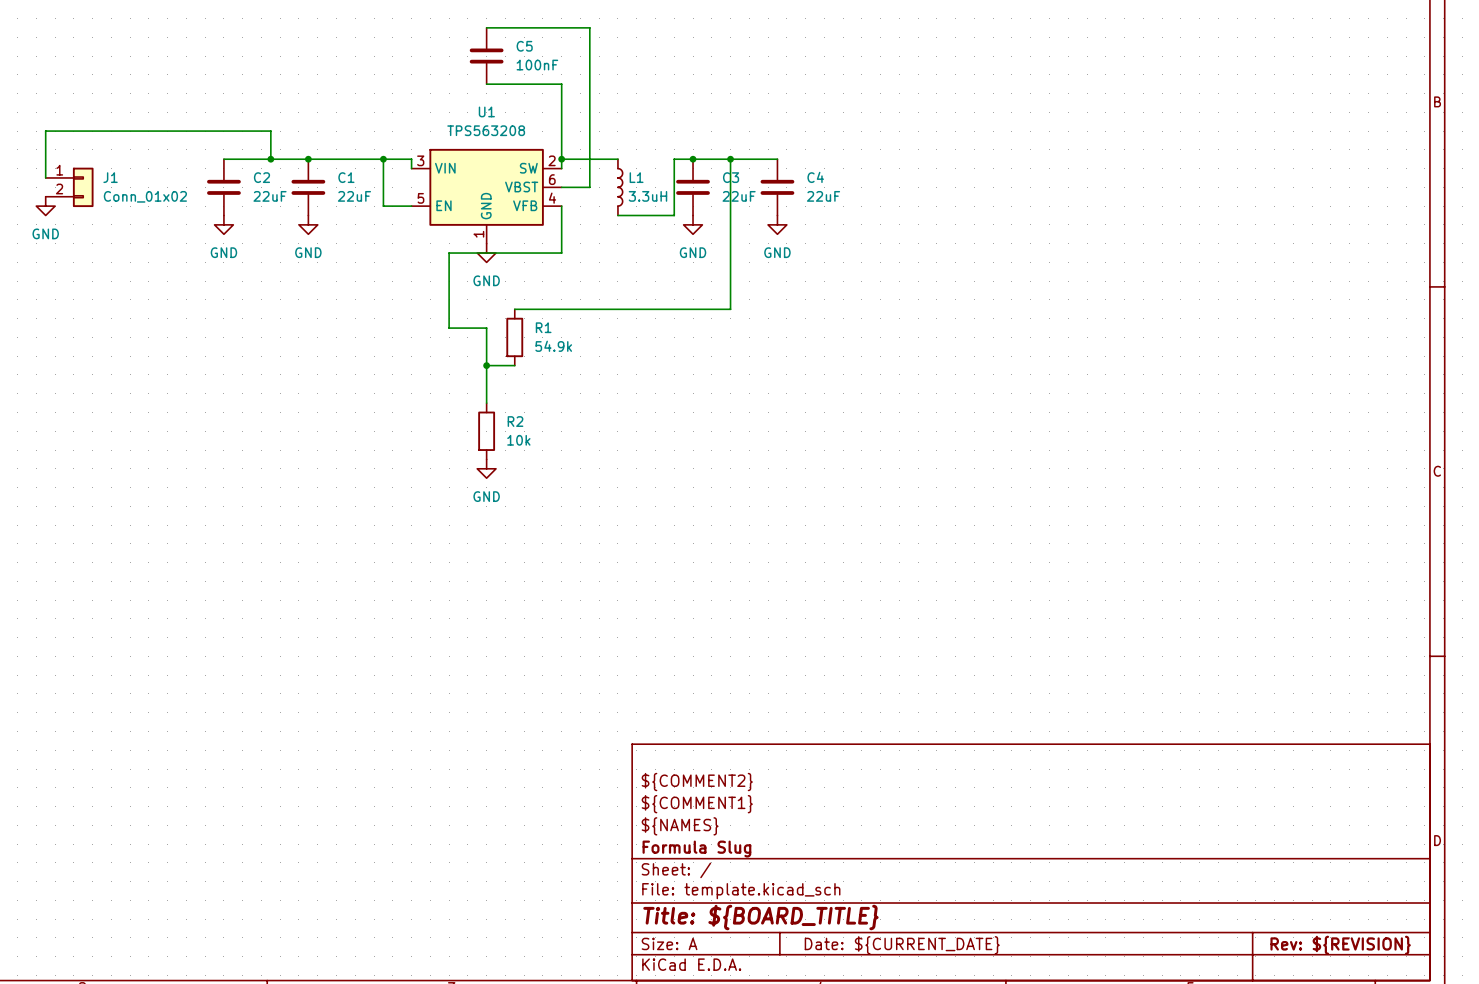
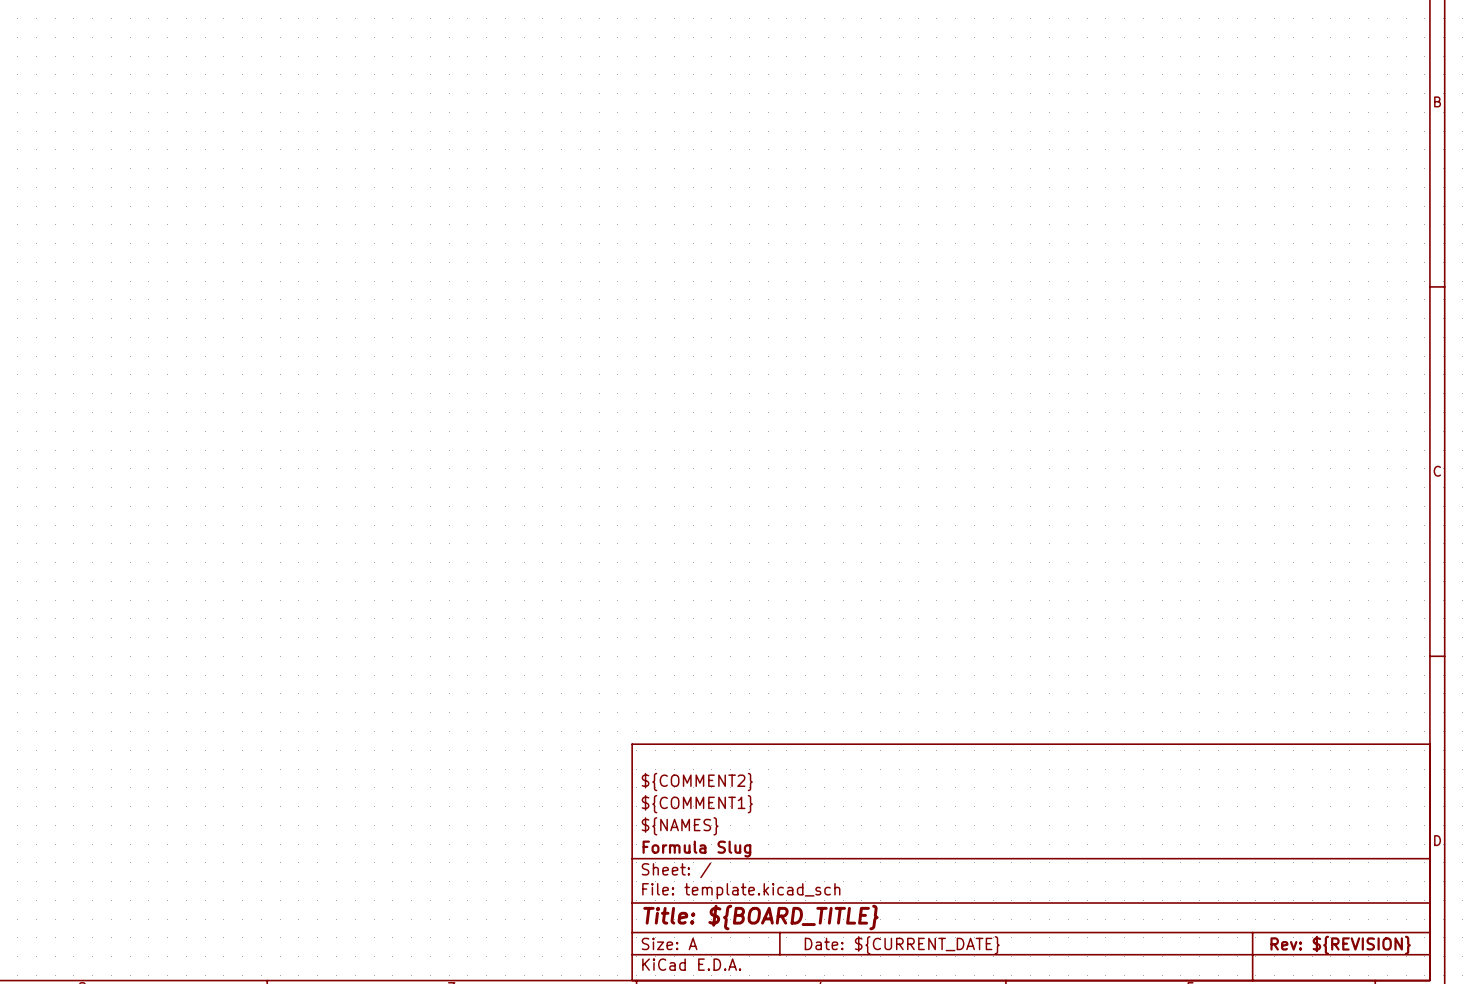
wire: (486, 27) (589, 27) (589, 187) (561, 187) -> none
C5: 100nF (486, 56) -> none
wire: (486, 84) (561, 84) (561, 168) -> none
wire: (223, 159) (411, 159) (411, 168) -> none
wire: (270, 159) (270, 131) (45, 131) (45, 177) -> none
junction: (270, 159) -> none
junction: (308, 159) -> none
wire: (383, 159) (383, 206) (411, 206) -> none
junction: (383, 159) -> none
wire: (561, 159) (617, 159) -> none
junction: (561, 159) -> none
junction: (693, 159) -> none
wire: (730, 159) (730, 309) (514, 309) -> none
junction: (730, 159) -> none
wire: (777, 159) (674, 159) (674, 215) (617, 215) -> none
J1: Conn_01x02 (69, 187) -> none
C2: 22uF (223, 187) -> none
C1: 22uF (308, 187) -> none
L1: 3.3uH (620, 187) -> none
C3: 22uF (693, 187) -> none
C4: 22uF (777, 187) -> none
U1: TPS563208 (486, 196) -> none
power symbol: GND (45, 206) -> none
wire: (561, 206) (561, 253) (449, 253) (449, 328) (486, 328) (486, 403) -> none
power symbol: GND (223, 224) -> none
power symbol: GND (308, 224) -> none
power symbol: GND (693, 224) -> none
power symbol: GND (777, 224) -> none
power symbol: GND (486, 253) -> none
R1: 54.9k (514, 337) -> none
wire: (486, 365) (514, 365) -> none
junction: (486, 365) -> none
R2: 10k (486, 431) -> none
power symbol: GND (486, 468) -> none

